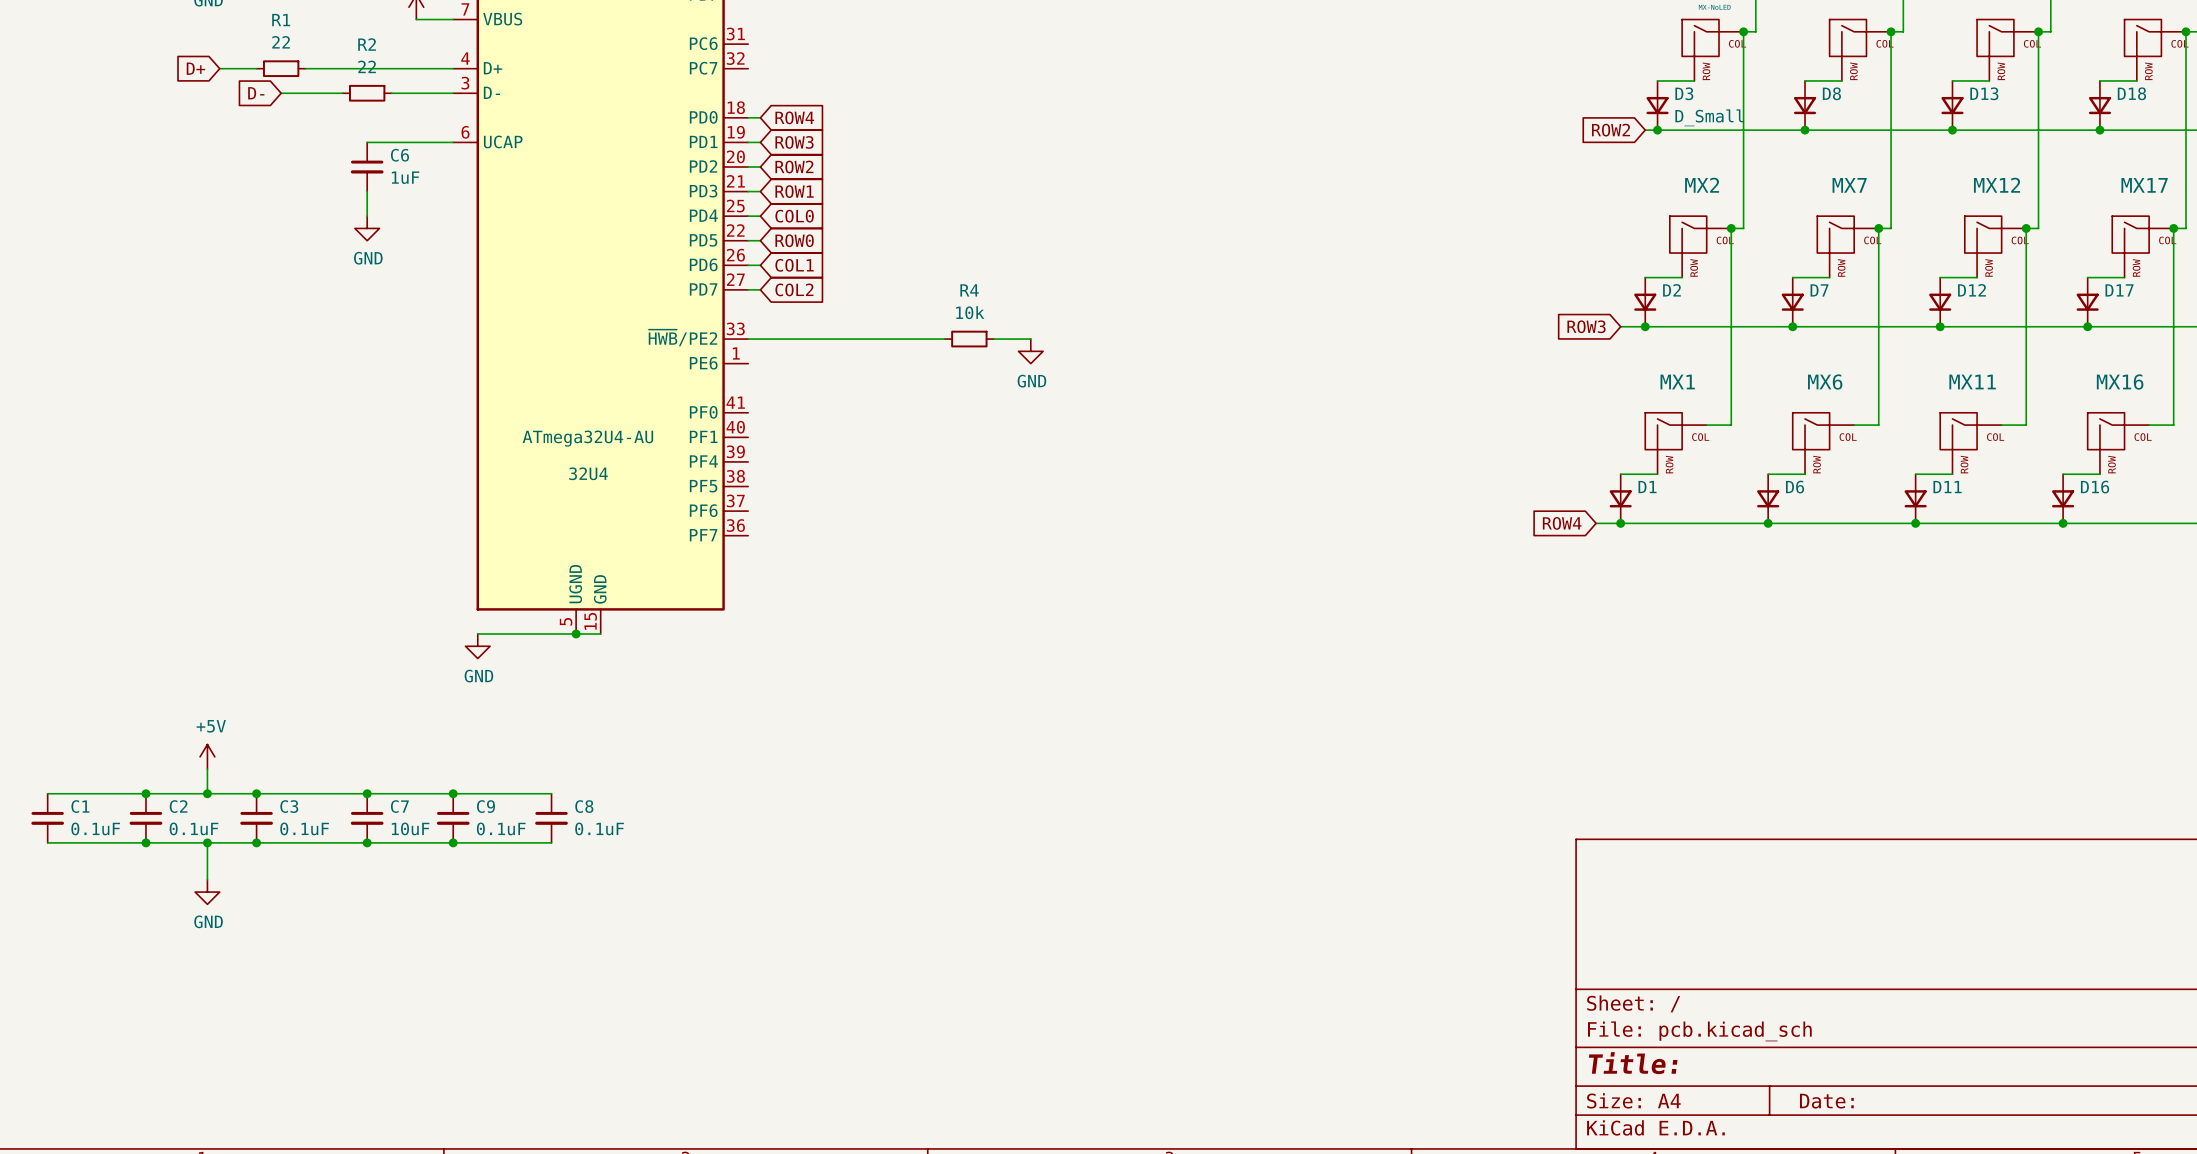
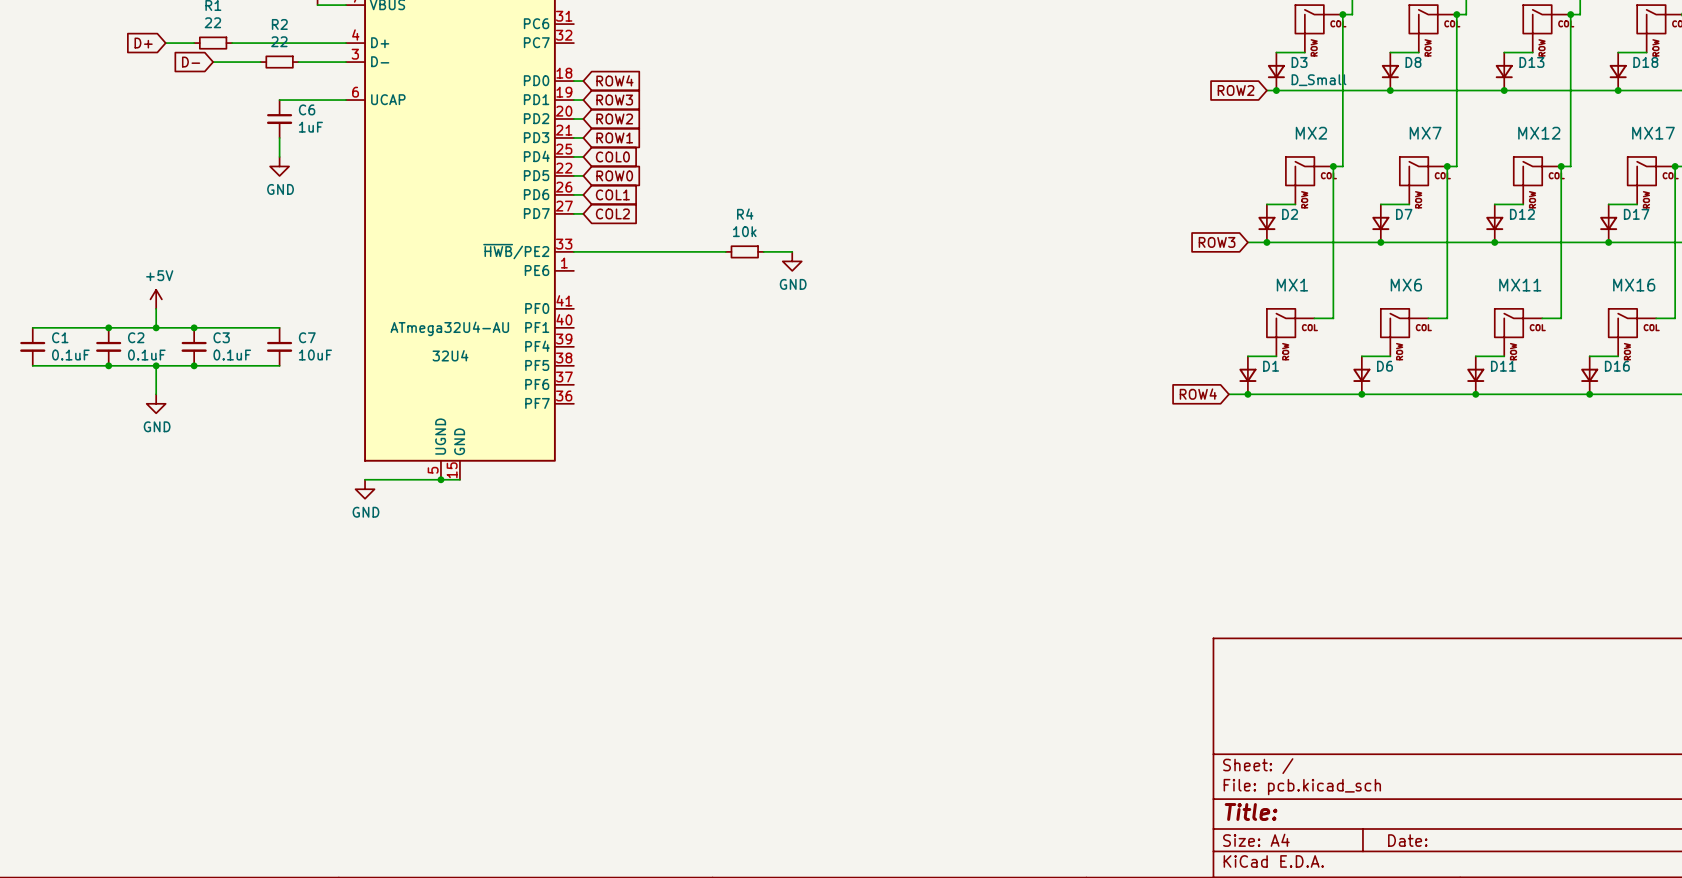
power symbol: none -> +5V (156, 299)
wire: none -> (156, 308) (156, 327)
wire: none -> (32, 327) (279, 327)
junction: none -> (108, 327)
junction: none -> (156, 327)
junction: none -> (194, 327)
wire: none -> (32, 365) (279, 365)
junction: none -> (108, 365)
wire: none -> (156, 365) (156, 394)
junction: none -> (156, 365)
junction: none -> (194, 365)
power symbol: none -> GND (156, 403)
power symbol: +5V (207, 756) -> none
wire: (207, 769) (207, 793) -> none
wire: (47, 793) (551, 793) -> none
junction: (145, 793) -> none
junction: (207, 793) -> none
junction: (256, 793) -> none
junction: (367, 793) -> none
junction: (453, 793) -> none
C1 position: (47, 818) -> (32, 346)
C2 position: (145, 818) -> (108, 346)
C3 position: (256, 818) -> (194, 346)
C7 position: (367, 818) -> (279, 346)
C9: 0.1uF (453, 818) -> none
C8: 0.1uF (551, 818) -> none
wire: (47, 842) (551, 842) -> none
junction: (145, 842) -> none
wire: (207, 842) (207, 879) -> none
junction: (207, 842) -> none
junction: (256, 842) -> none
junction: (367, 842) -> none
junction: (453, 842) -> none
power symbol: GND (207, 892) -> none

